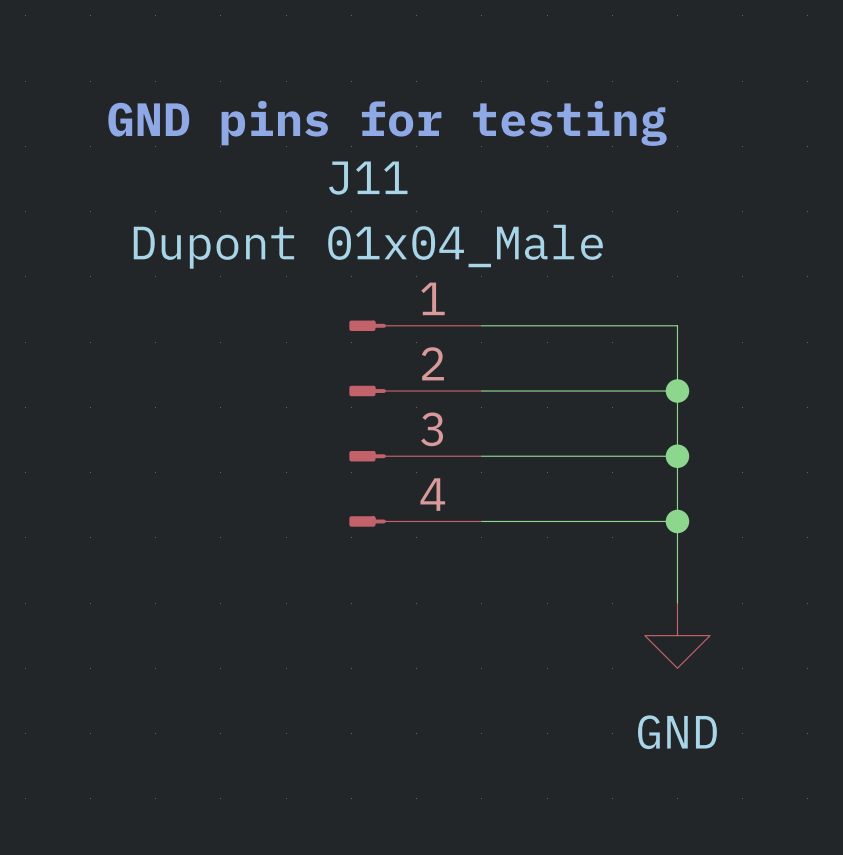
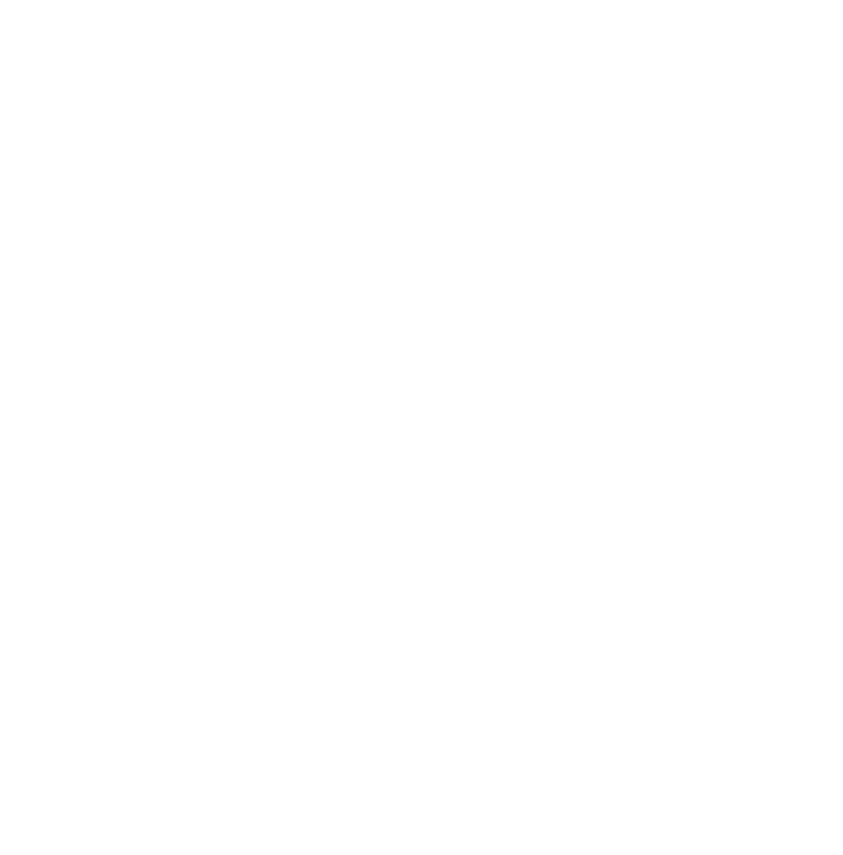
text: GND pins for testing (387, 123) -> none
wire: (481, 325) (677, 325) (677, 603) -> none
wire: (481, 391) (677, 391) -> none
junction: (677, 391) -> none
J11: Dupont 01x04_Male (415, 423) -> none
wire: (481, 456) (677, 456) -> none
junction: (677, 456) -> none
wire: (481, 521) (677, 521) -> none
junction: (677, 521) -> none
power symbol: GND (677, 635) -> none

